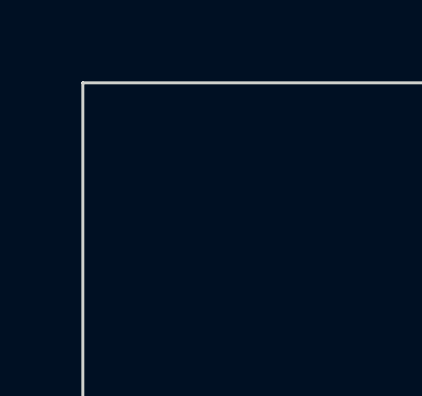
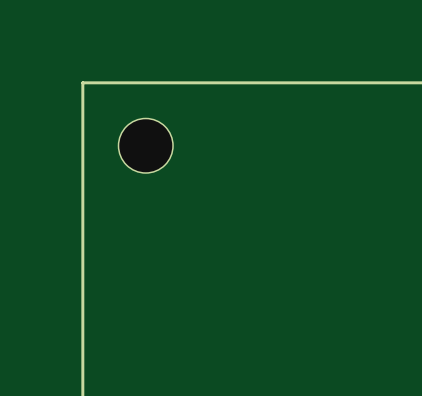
part: none -> (145, 145)

